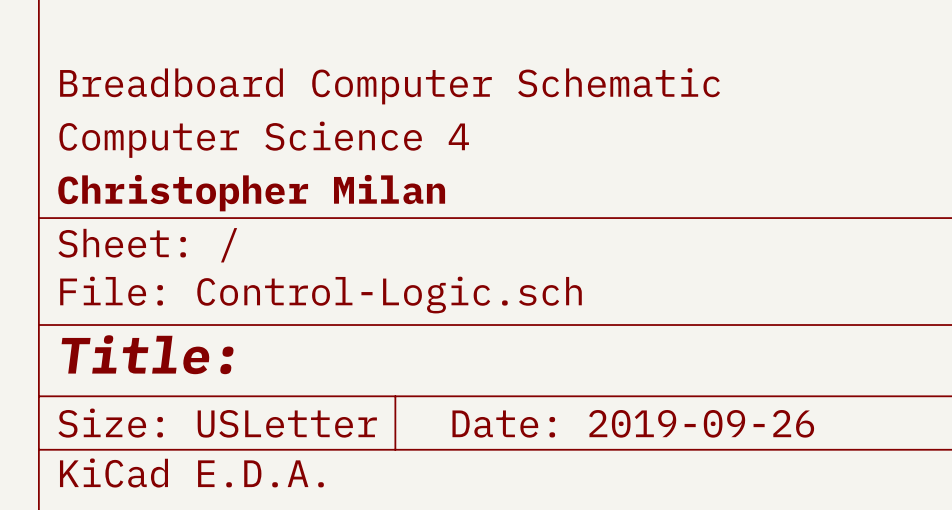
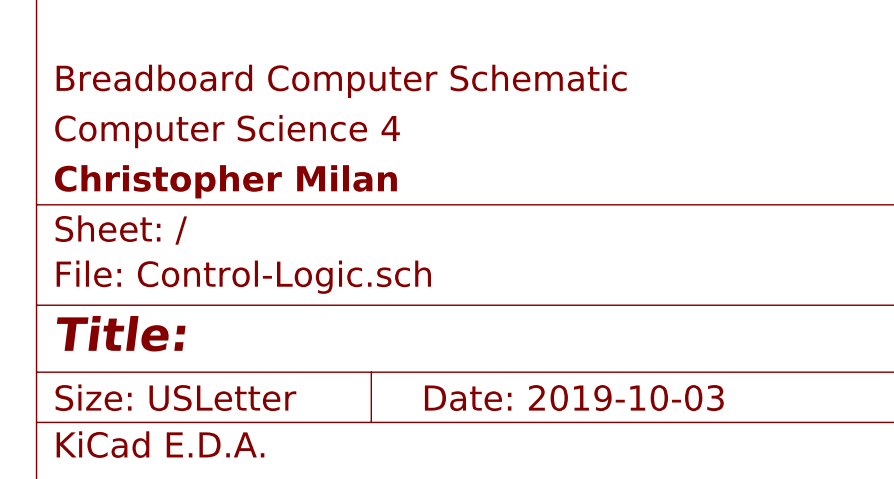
title block: Date: 2019-09-26 (633, 423) -> Date: 2019-10-03 (574, 398)

